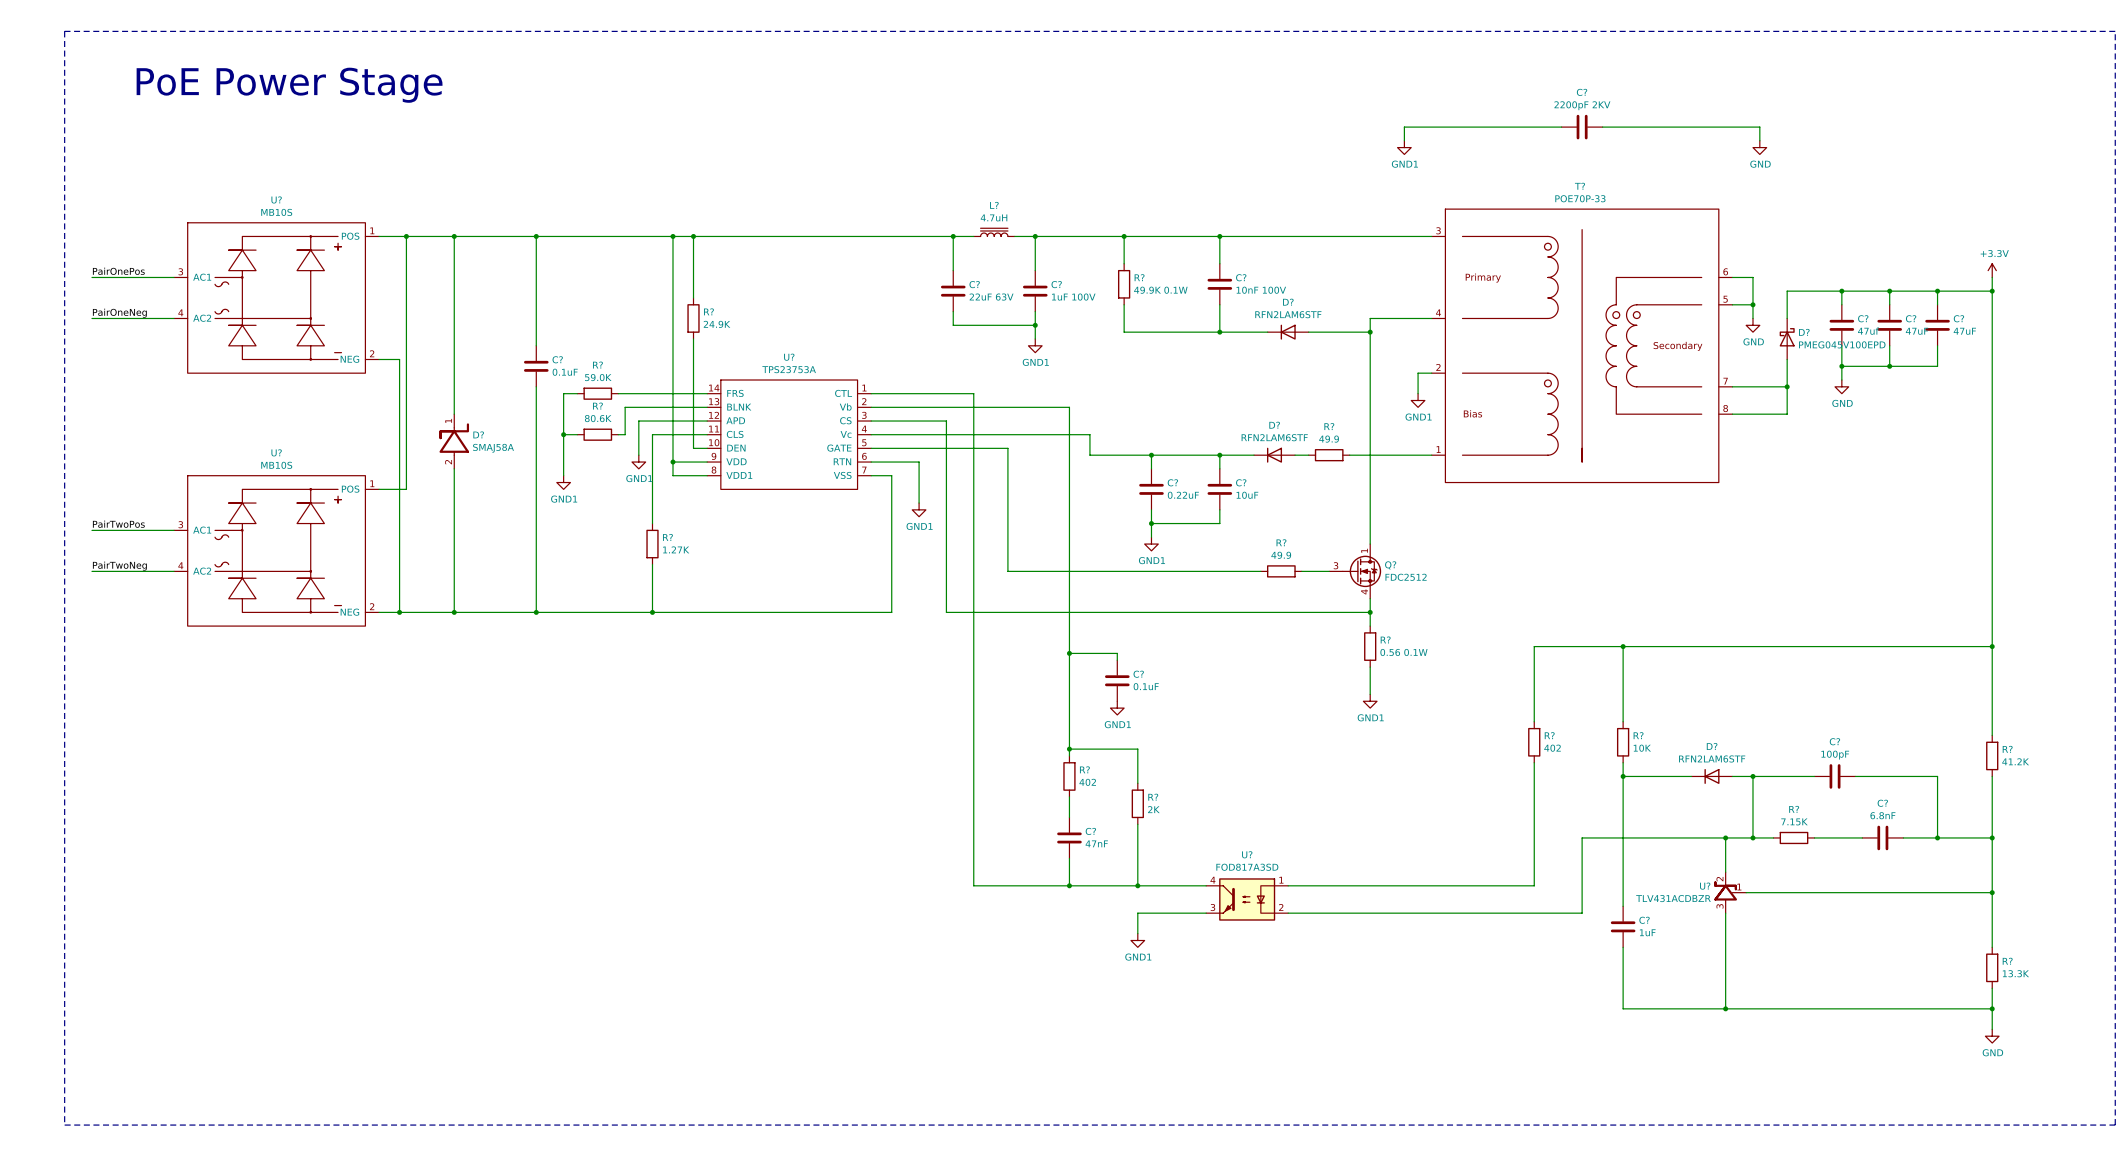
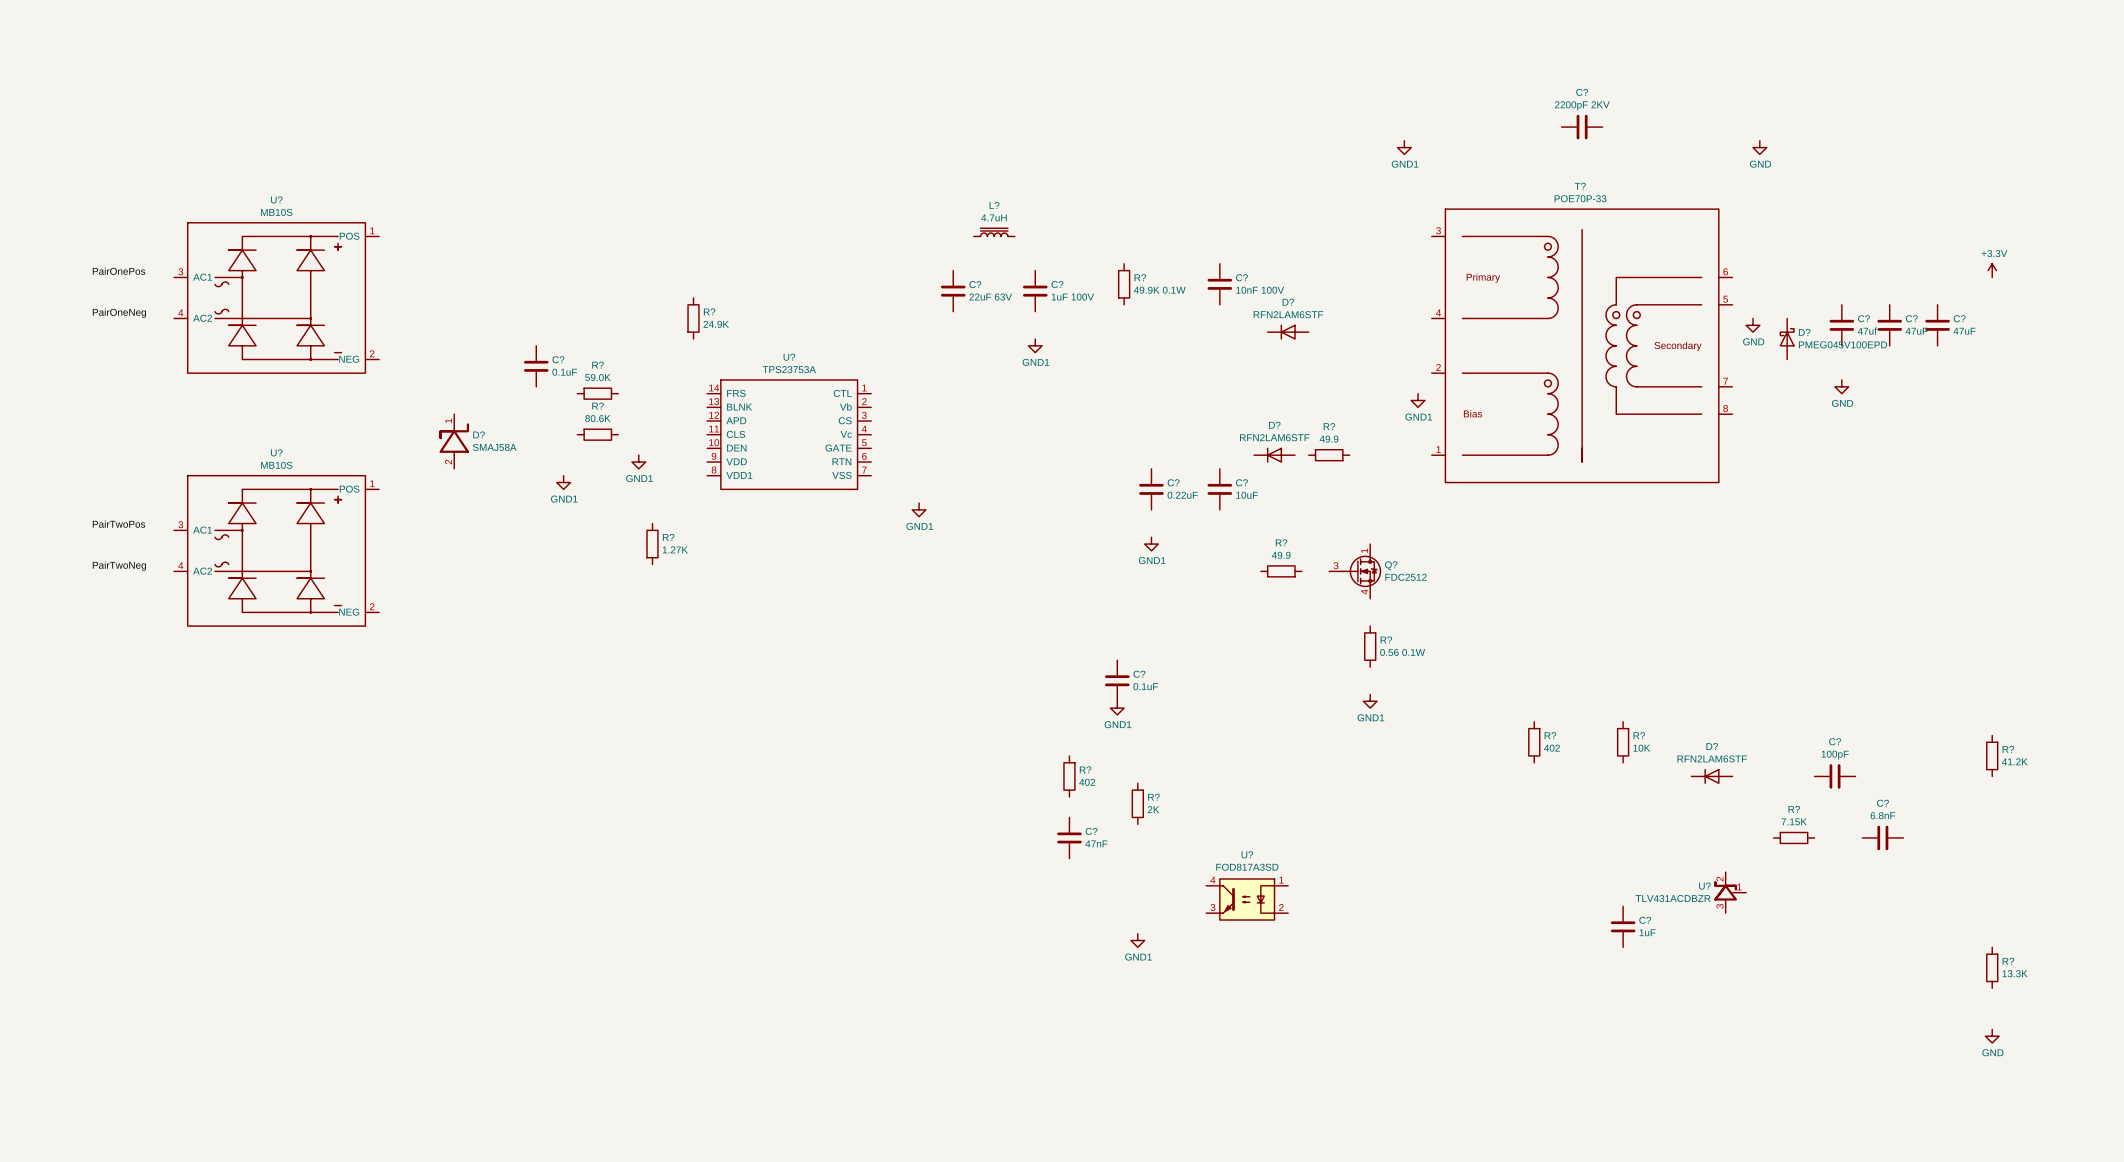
line: (64, 31) (2115, 31) (2115, 1125) (64, 1125) (64, 31) -> none
text: PoE Power Stage (289, 85) -> none
wire: (1561, 127) (1404, 127) (1404, 140) -> none
wire: (1602, 127) (1759, 127) (1759, 140) -> none
wire: (379, 236) (973, 236) -> none
wire: (406, 236) (406, 489) (379, 489) -> none
junction: (406, 236) -> none
wire: (454, 236) (454, 414) -> none
junction: (454, 236) -> none
wire: (536, 236) (536, 345) -> none
junction: (536, 236) -> none
wire: (673, 236) (673, 475) (707, 475) -> none
junction: (673, 236) -> none
wire: (693, 236) (693, 297) -> none
junction: (693, 236) -> none
wire: (953, 236) (953, 270) -> none
junction: (953, 236) -> none
wire: (1014, 236) (1431, 236) -> none
wire: (1035, 236) (1035, 270) -> none
junction: (1035, 236) -> none
wire: (1124, 236) (1124, 263) -> none
junction: (1124, 236) -> none
wire: (1219, 236) (1219, 263) -> none
junction: (1219, 236) -> none
wire: (91, 277) (174, 277) -> none
wire: (1732, 277) (1752, 277) (1752, 318) -> none
wire: (1992, 277) (1992, 735) -> none
wire: (1841, 291) (1841, 304) -> none
junction: (1841, 291) -> none
wire: (1889, 291) (1889, 304) -> none
junction: (1889, 291) -> none
wire: (1937, 291) (1937, 304) -> none
junction: (1937, 291) -> none
wire: (1992, 291) (1787, 291) (1787, 318) -> none
junction: (1992, 291) -> none
wire: (1124, 304) (1124, 332) (1267, 332) -> none
wire: (1219, 304) (1219, 332) -> none
wire: (1732, 304) (1752, 304) -> none
junction: (1752, 304) -> none
wire: (953, 311) (953, 325) (1035, 325) -> none
wire: (1035, 311) (1035, 338) -> none
wire: (91, 318) (174, 318) -> none
wire: (1431, 318) (1370, 318) (1370, 544) -> none
junction: (1035, 325) -> none
junction: (1219, 332) -> none
wire: (1308, 332) (1370, 332) -> none
junction: (1370, 332) -> none
wire: (693, 338) (693, 448) (707, 448) -> none
wire: (1841, 345) (1841, 380) -> none
wire: (1889, 345) (1889, 366) -> none
wire: (1937, 345) (1937, 366) (1841, 366) -> none
wire: (379, 359) (399, 359) (399, 612) -> none
wire: (1787, 359) (1787, 414) (1732, 414) -> none
junction: (1841, 366) -> none
junction: (1889, 366) -> none
wire: (1431, 373) (1418, 373) (1418, 393) -> none
wire: (536, 386) (536, 612) -> none
wire: (1732, 386) (1787, 386) -> none
junction: (1787, 386) -> none
wire: (577, 393) (563, 393) (563, 475) -> none
wire: (618, 393) (707, 393) -> none
wire: (871, 393) (973, 393) (973, 885) (1206, 885) -> none
wire: (707, 407) (625, 407) (625, 434) (618, 434) -> none
wire: (871, 407) (1069, 407) (1069, 755) -> none
wire: (707, 421) (638, 421) (638, 455) -> none
wire: (871, 421) (946, 421) (946, 612) (1370, 612) -> none
wire: (563, 434) (577, 434) -> none
junction: (563, 434) -> none
wire: (707, 434) (652, 434) (652, 523) -> none
wire: (871, 434) (1089, 434) (1089, 455) (1254, 455) -> none
wire: (871, 448) (1007, 448) (1007, 571) (1260, 571) -> none
wire: (1151, 455) (1151, 468) -> none
junction: (1151, 455) -> none
wire: (1219, 455) (1219, 468) -> none
junction: (1219, 455) -> none
wire: (1295, 455) (1308, 455) -> none
wire: (1349, 455) (1431, 455) -> none
wire: (673, 462) (707, 462) -> none
junction: (673, 462) -> none
wire: (871, 462) (919, 462) (919, 503) -> none
wire: (454, 468) (454, 612) -> none
wire: (871, 475) (891, 475) (891, 612) (379, 612) -> none
wire: (1151, 509) (1151, 537) -> none
wire: (1219, 509) (1219, 523) (1151, 523) -> none
junction: (1151, 523) -> none
wire: (91, 530) (174, 530) -> none
wire: (652, 564) (652, 612) -> none
wire: (91, 571) (174, 571) -> none
wire: (1301, 571) (1329, 571) -> none
wire: (1370, 598) (1370, 626) -> none
junction: (399, 612) -> none
junction: (454, 612) -> none
junction: (536, 612) -> none
junction: (652, 612) -> none
junction: (1370, 612) -> none
wire: (1623, 646) (1623, 721) -> none
junction: (1623, 646) -> none
wire: (1992, 646) (1534, 646) (1534, 721) -> none
junction: (1992, 646) -> none
wire: (1069, 653) (1117, 653) (1117, 660) -> none
junction: (1069, 653) -> none
wire: (1370, 667) (1370, 694) -> none
wire: (1069, 749) (1137, 749) (1137, 783) -> none
junction: (1069, 749) -> none
wire: (1534, 762) (1534, 885) (1288, 885) -> none
wire: (1623, 762) (1623, 906) -> none
wire: (1623, 776) (1691, 776) -> none
junction: (1623, 776) -> none
wire: (1732, 776) (1814, 776) -> none
wire: (1752, 776) (1752, 837) -> none
junction: (1752, 776) -> none
wire: (1855, 776) (1937, 776) (1937, 837) -> none
wire: (1992, 776) (1992, 947) -> none
wire: (1069, 796) (1069, 817) -> none
wire: (1137, 824) (1137, 885) -> none
wire: (1725, 837) (1725, 872) -> none
junction: (1725, 837) -> none
junction: (1752, 837) -> none
wire: (1773, 837) (1582, 837) (1582, 913) (1288, 913) -> none
wire: (1814, 837) (1862, 837) -> none
wire: (1903, 837) (1992, 837) -> none
junction: (1937, 837) -> none
junction: (1992, 837) -> none
wire: (1069, 858) (1069, 885) -> none
junction: (1069, 885) -> none
junction: (1137, 885) -> none
wire: (1746, 892) (1992, 892) -> none
junction: (1992, 892) -> none
wire: (1206, 913) (1137, 913) (1137, 933) -> none
wire: (1725, 913) (1725, 1008) -> none
wire: (1623, 947) (1623, 1008) (1992, 1008) -> none
wire: (1992, 988) (1992, 1029) -> none
junction: (1725, 1008) -> none
junction: (1992, 1008) -> none

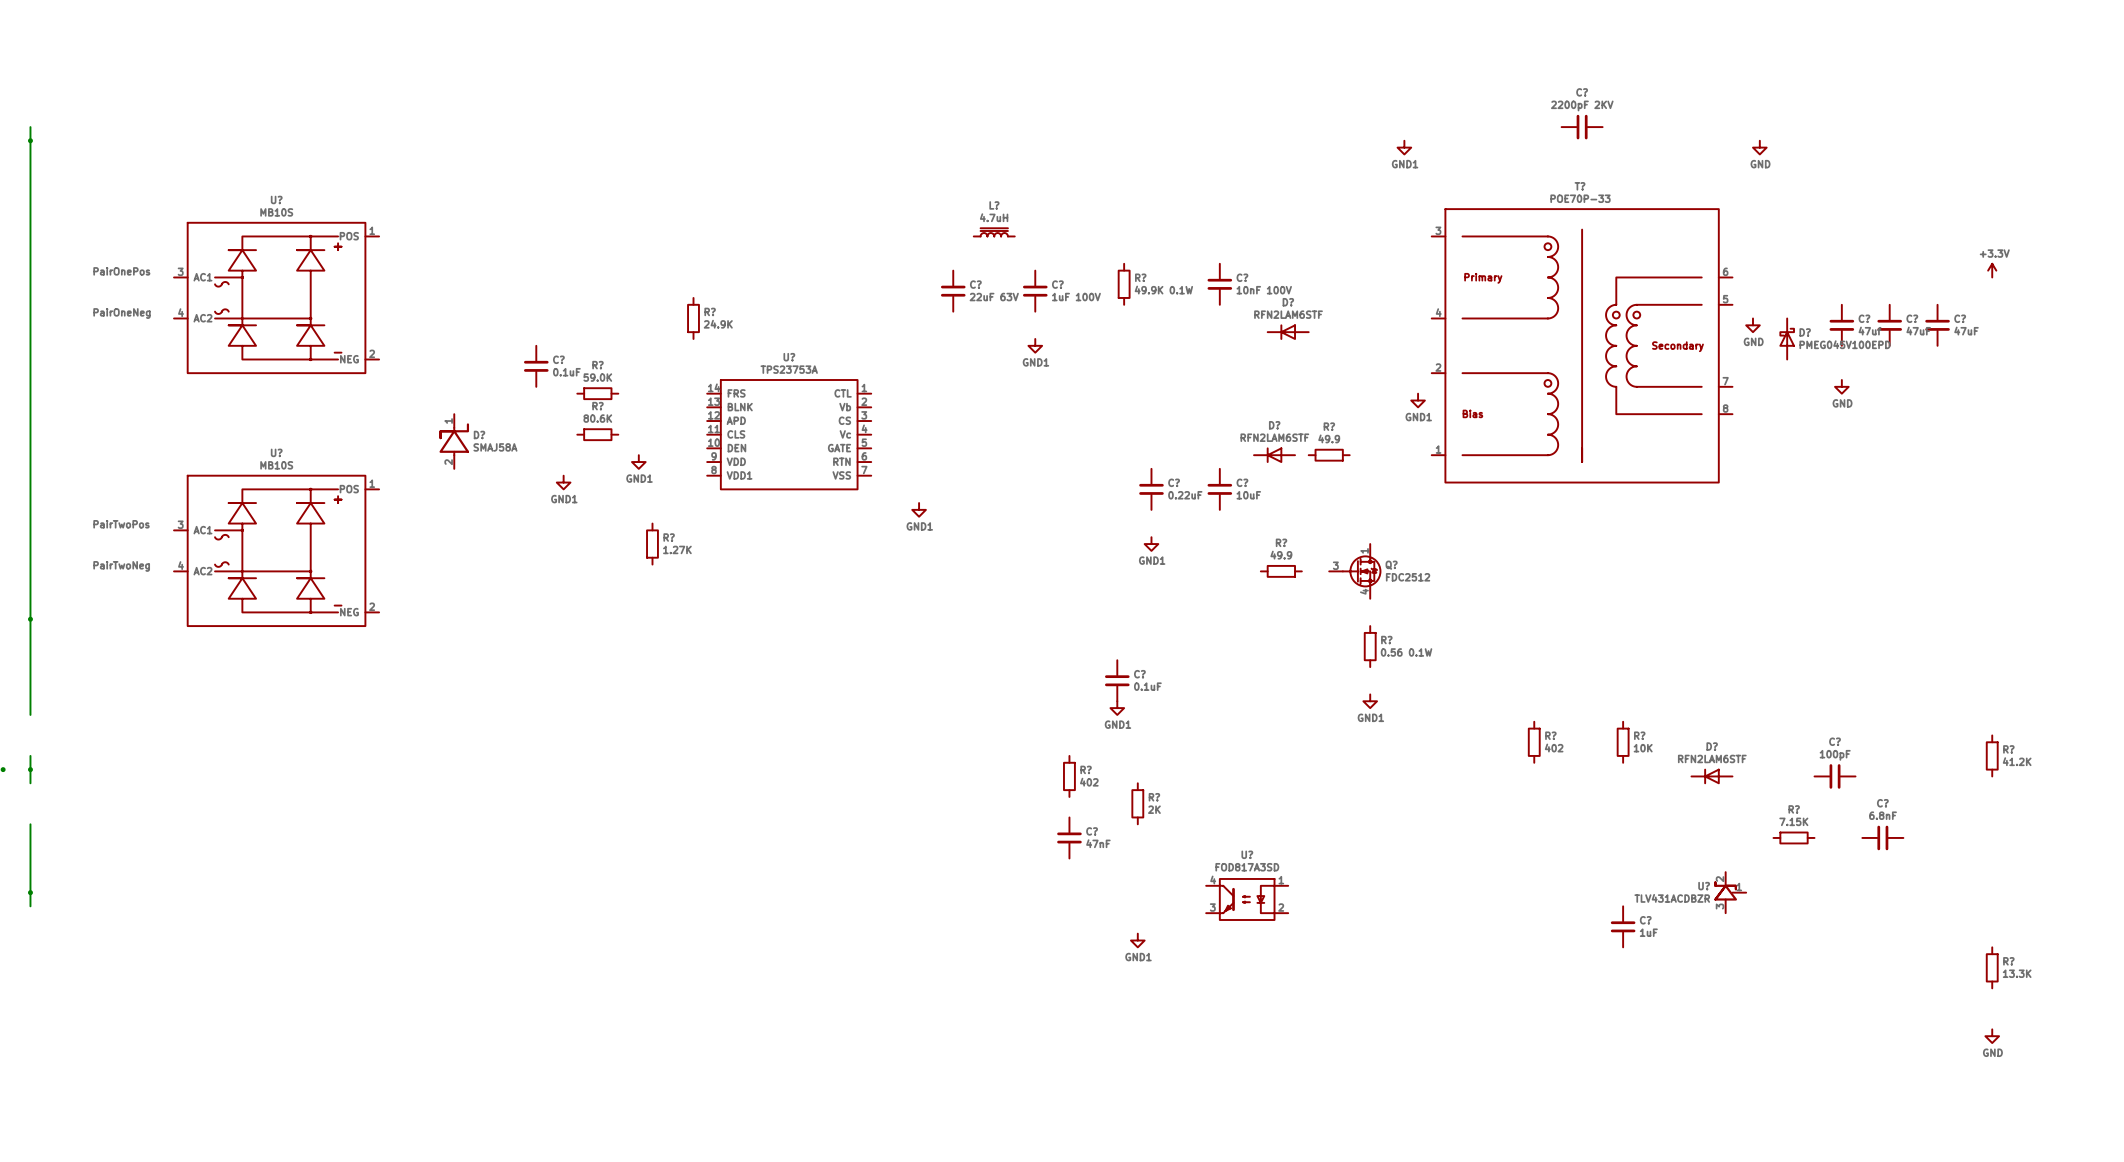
wire: none -> (30, 127) (30, 714)
junction: none -> (30, 140)
junction: none -> (30, 619)
wire: none -> (30, 755) (30, 783)
junction: none -> (3, 769)
junction: none -> (30, 769)
wire: none -> (30, 824) (30, 906)
junction: none -> (30, 892)

